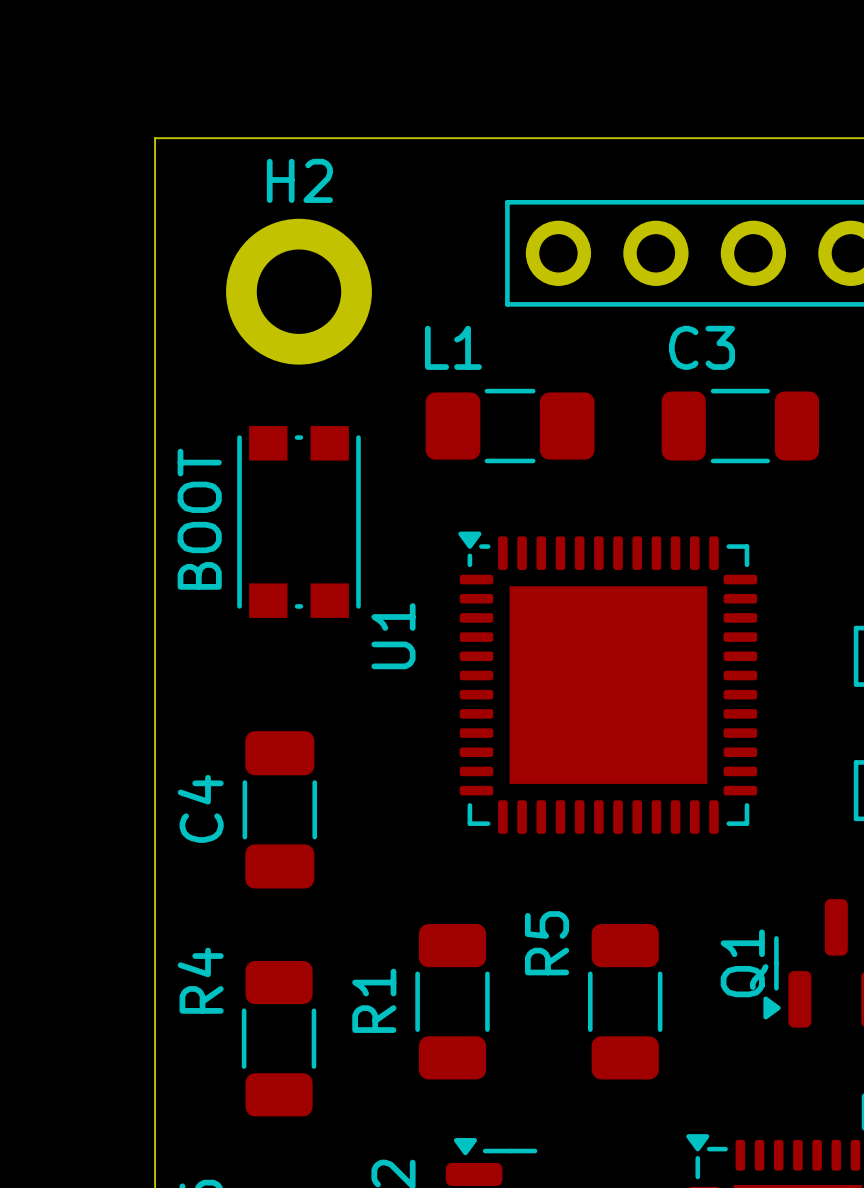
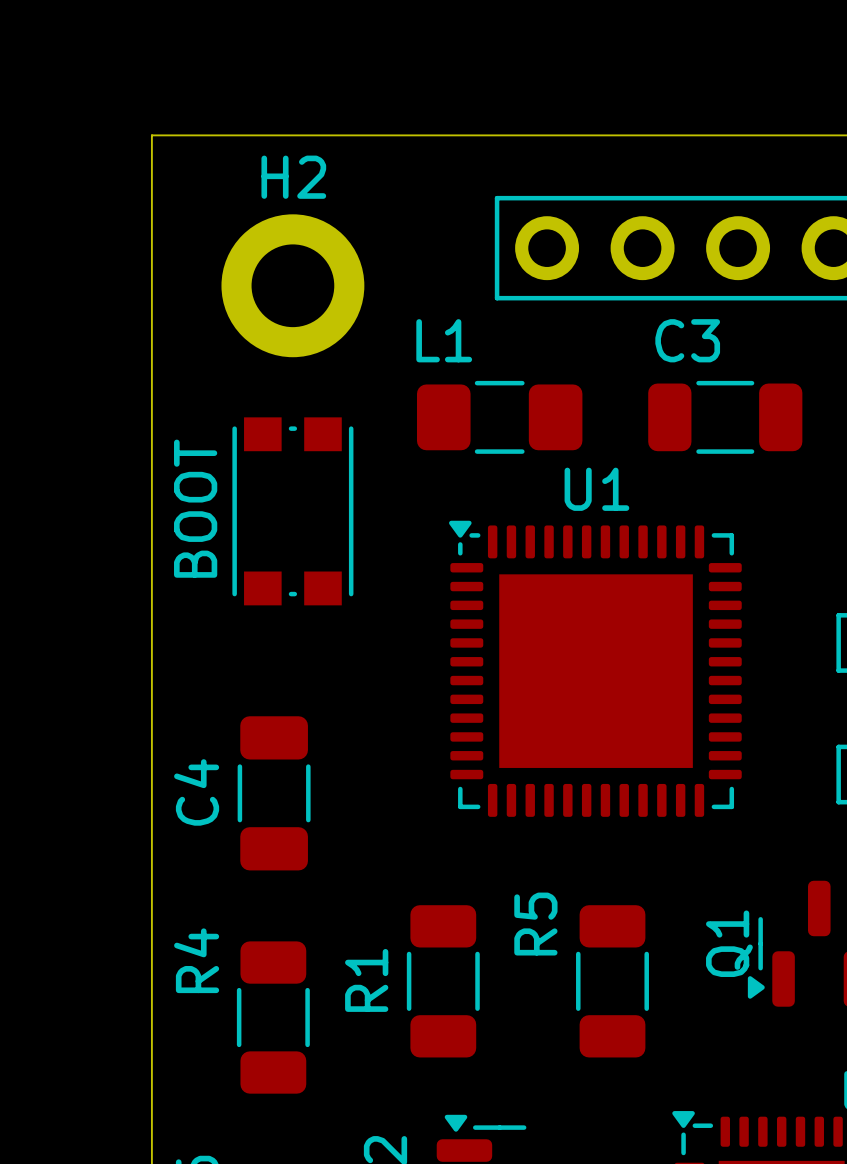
U1 name rotation: 0° (393, 636) -> 90° clockwise (596, 489)
U1 name position: U1 (393, 636) -> U1 (596, 489)

